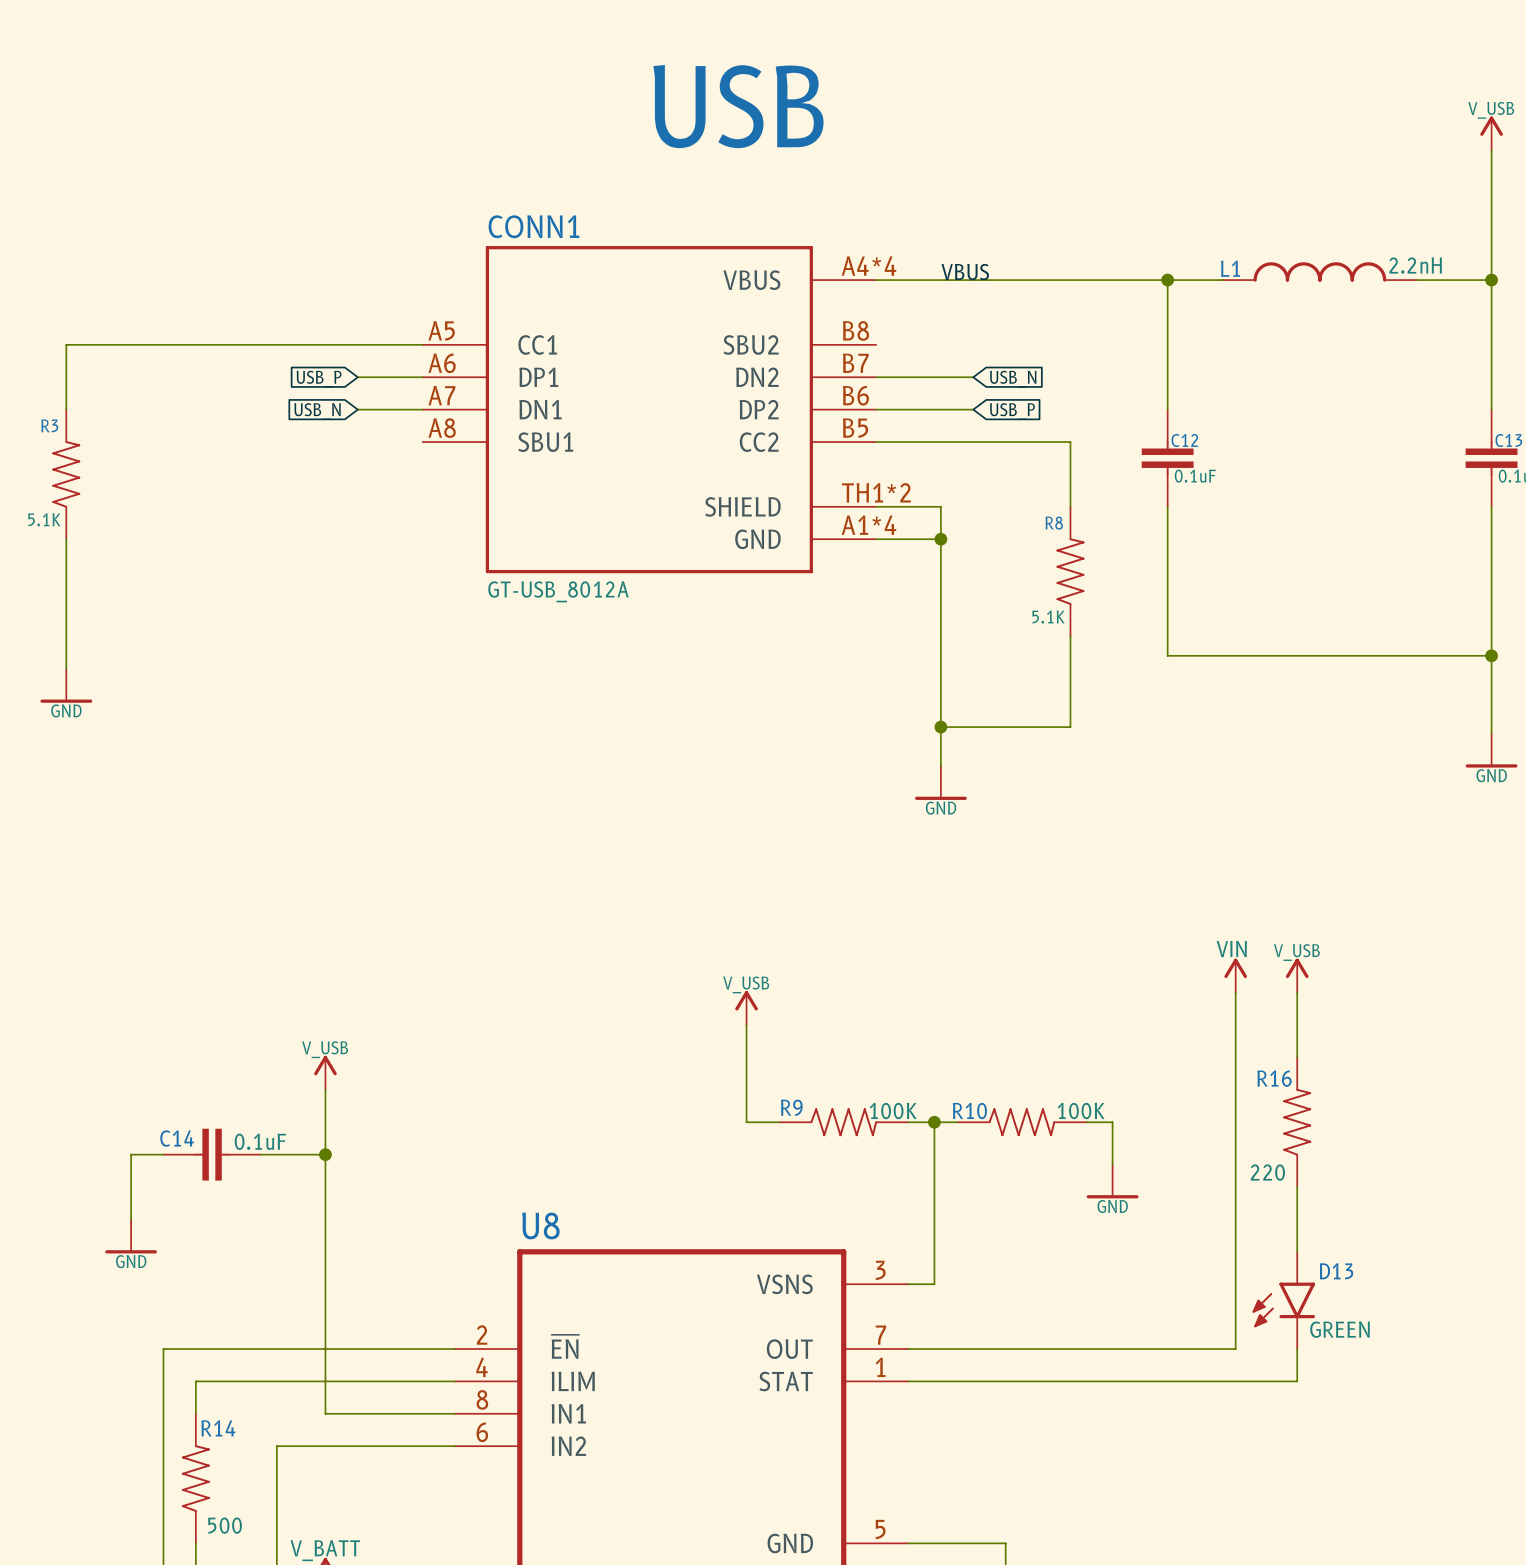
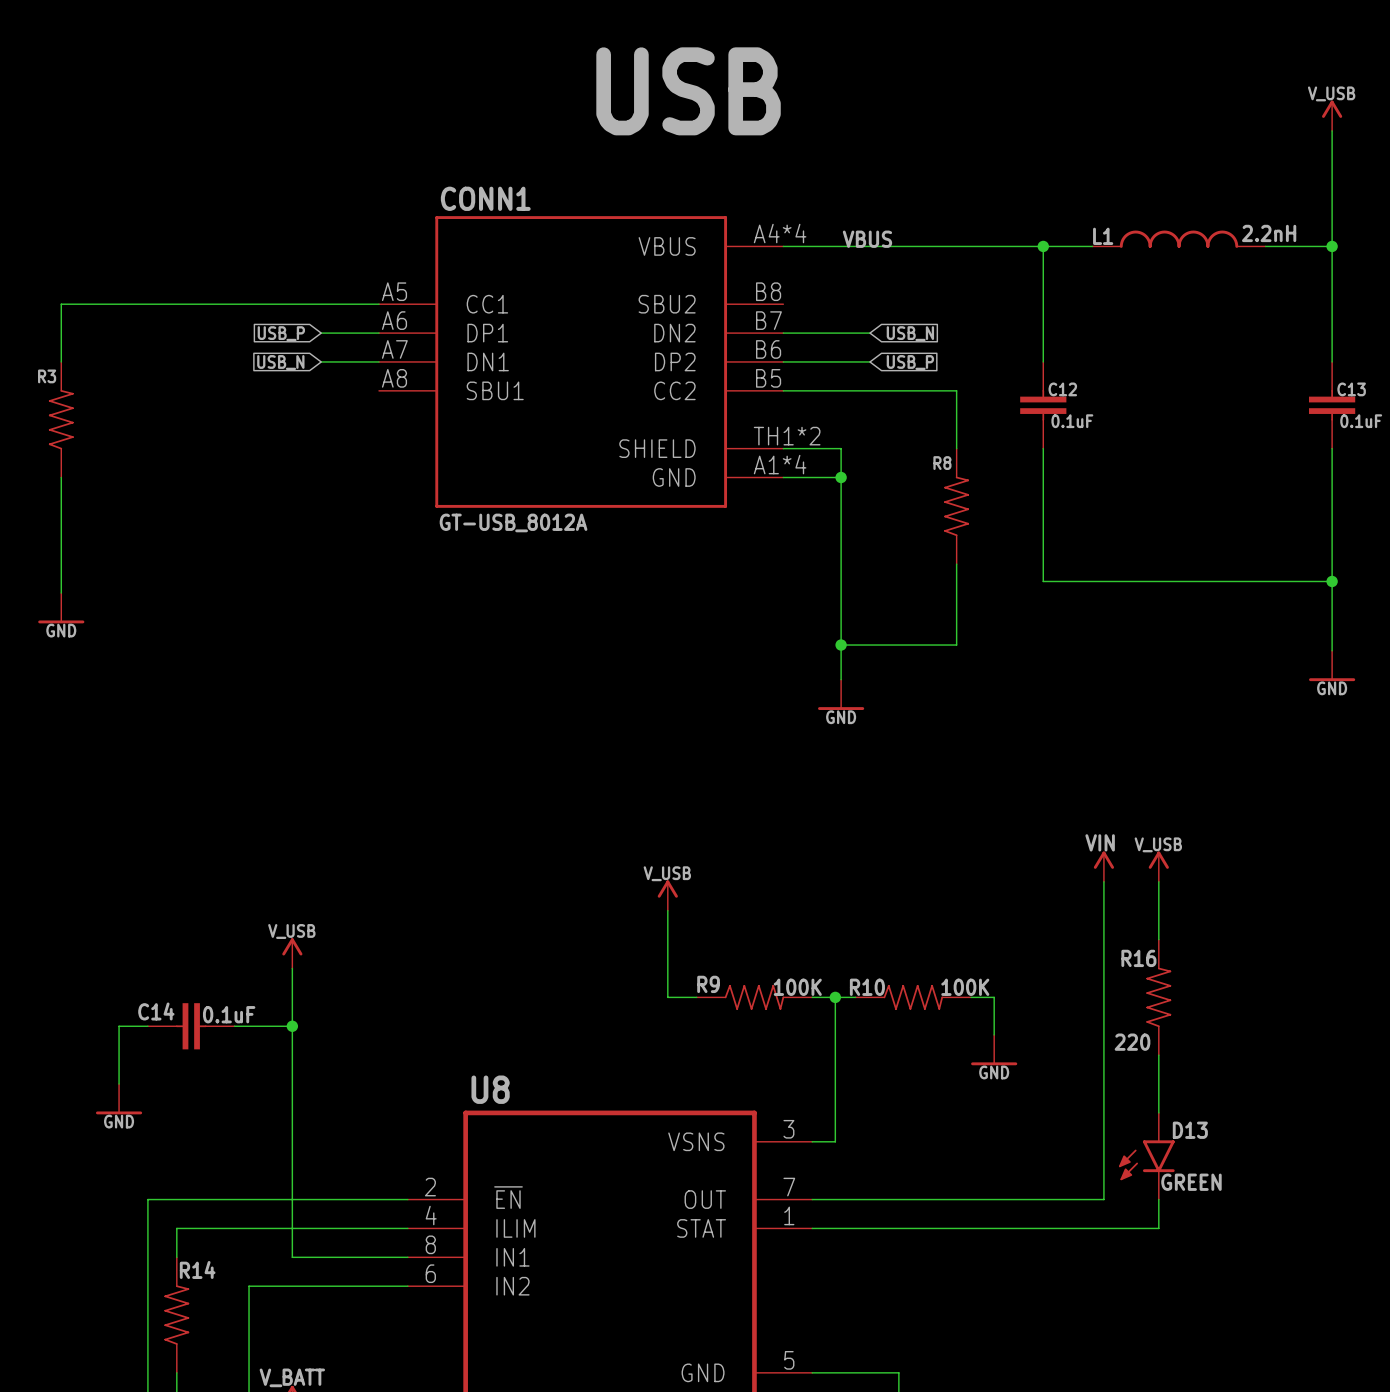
R3 value: 5.1K (44, 519) -> none
R8 value: 5.1K (1048, 617) -> none
R14 value: 500 (225, 1525) -> none

